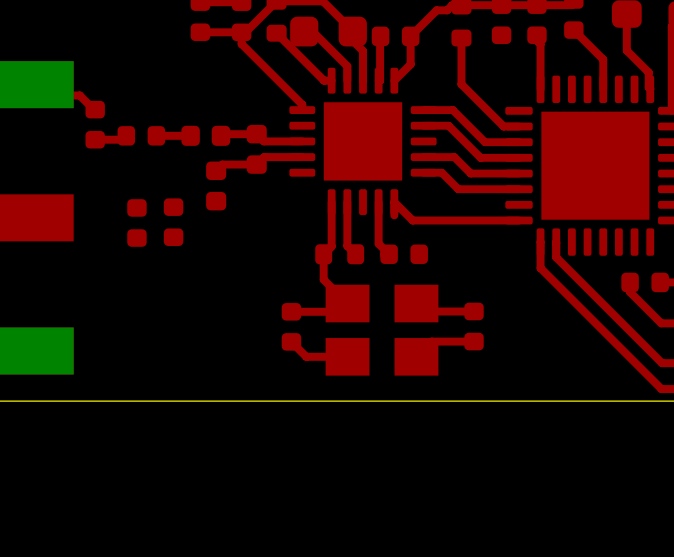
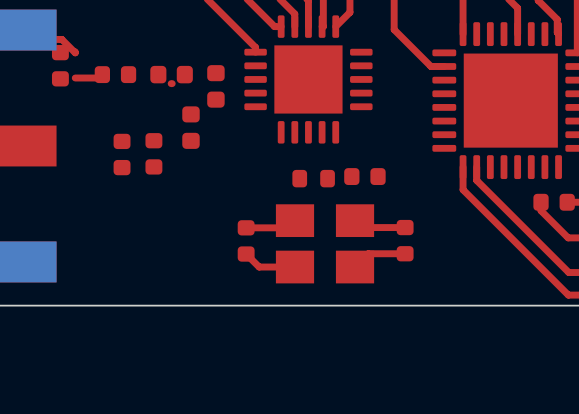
top track: (423, 110) (452, 110) (484, 142) (519, 142) -> none
part position: (95, 124) -> (60, 65)
top track: (423, 125) (448, 125) (480, 157) (519, 157) -> none
top track: (190, 135) (156, 135) -> none
top track: (221, 135) (222, 134) (256, 134) (263, 141) (302, 141) -> none
top track: none -> (172, 83) (171, 83)
top track: (302, 157) (264, 157) (256, 164) (222, 164) (216, 170) -> none
top track: (423, 157) (454, 157) (470, 173) (519, 173) -> none
top track: (423, 172) (441, 172) (458, 189) (519, 189) -> none
part position: (216, 185) -> (190, 127)
top track: (331, 202) (331, 246) (323, 254) (323, 279) (347, 303) -> none
top track: (347, 202) (347, 245) (355, 254) -> none
top track: (378, 202) (378, 243) (387, 254) -> none
top track: (394, 215) (394, 202) (412, 220) (519, 220) -> none
part: (136, 222) -> none
part: (173, 222) -> none
part: none -> (153, 153)
part: none -> (122, 154)
part position: (339, 254) -> (313, 178)
part position: (404, 254) -> (364, 176)

